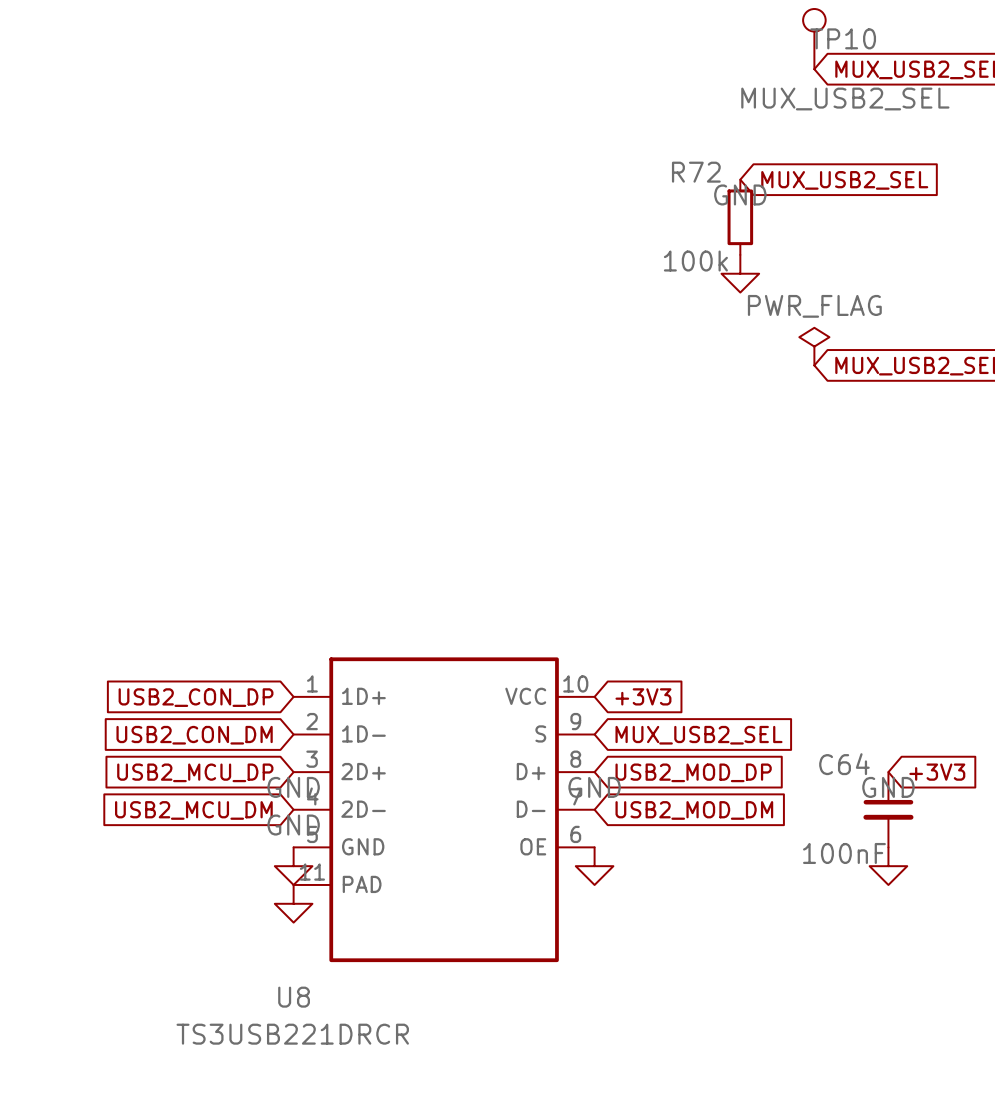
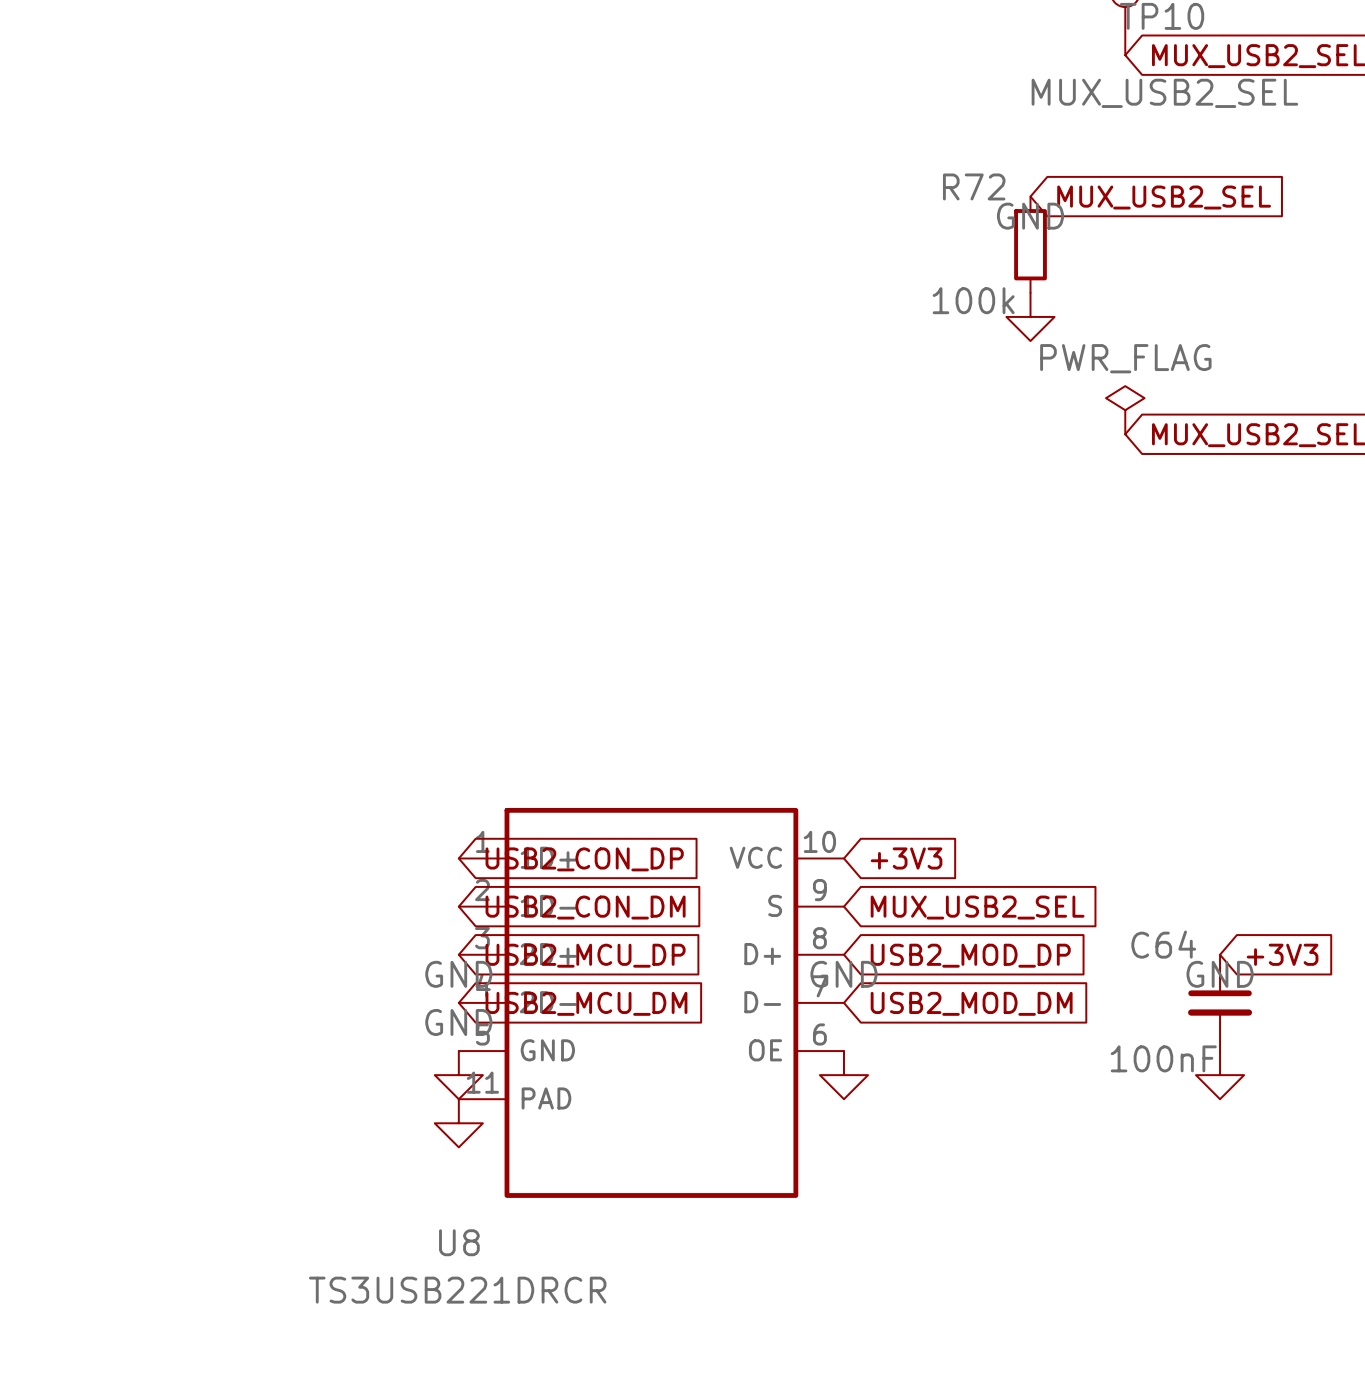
global label rotation: 0° (196, 697) -> 180° (584, 859)
global label rotation: 0° (194, 735) -> 180° (585, 907)
global label rotation: 0° (195, 772) -> 180° (585, 955)
global label rotation: 0° (193, 810) -> 180° (586, 1003)

